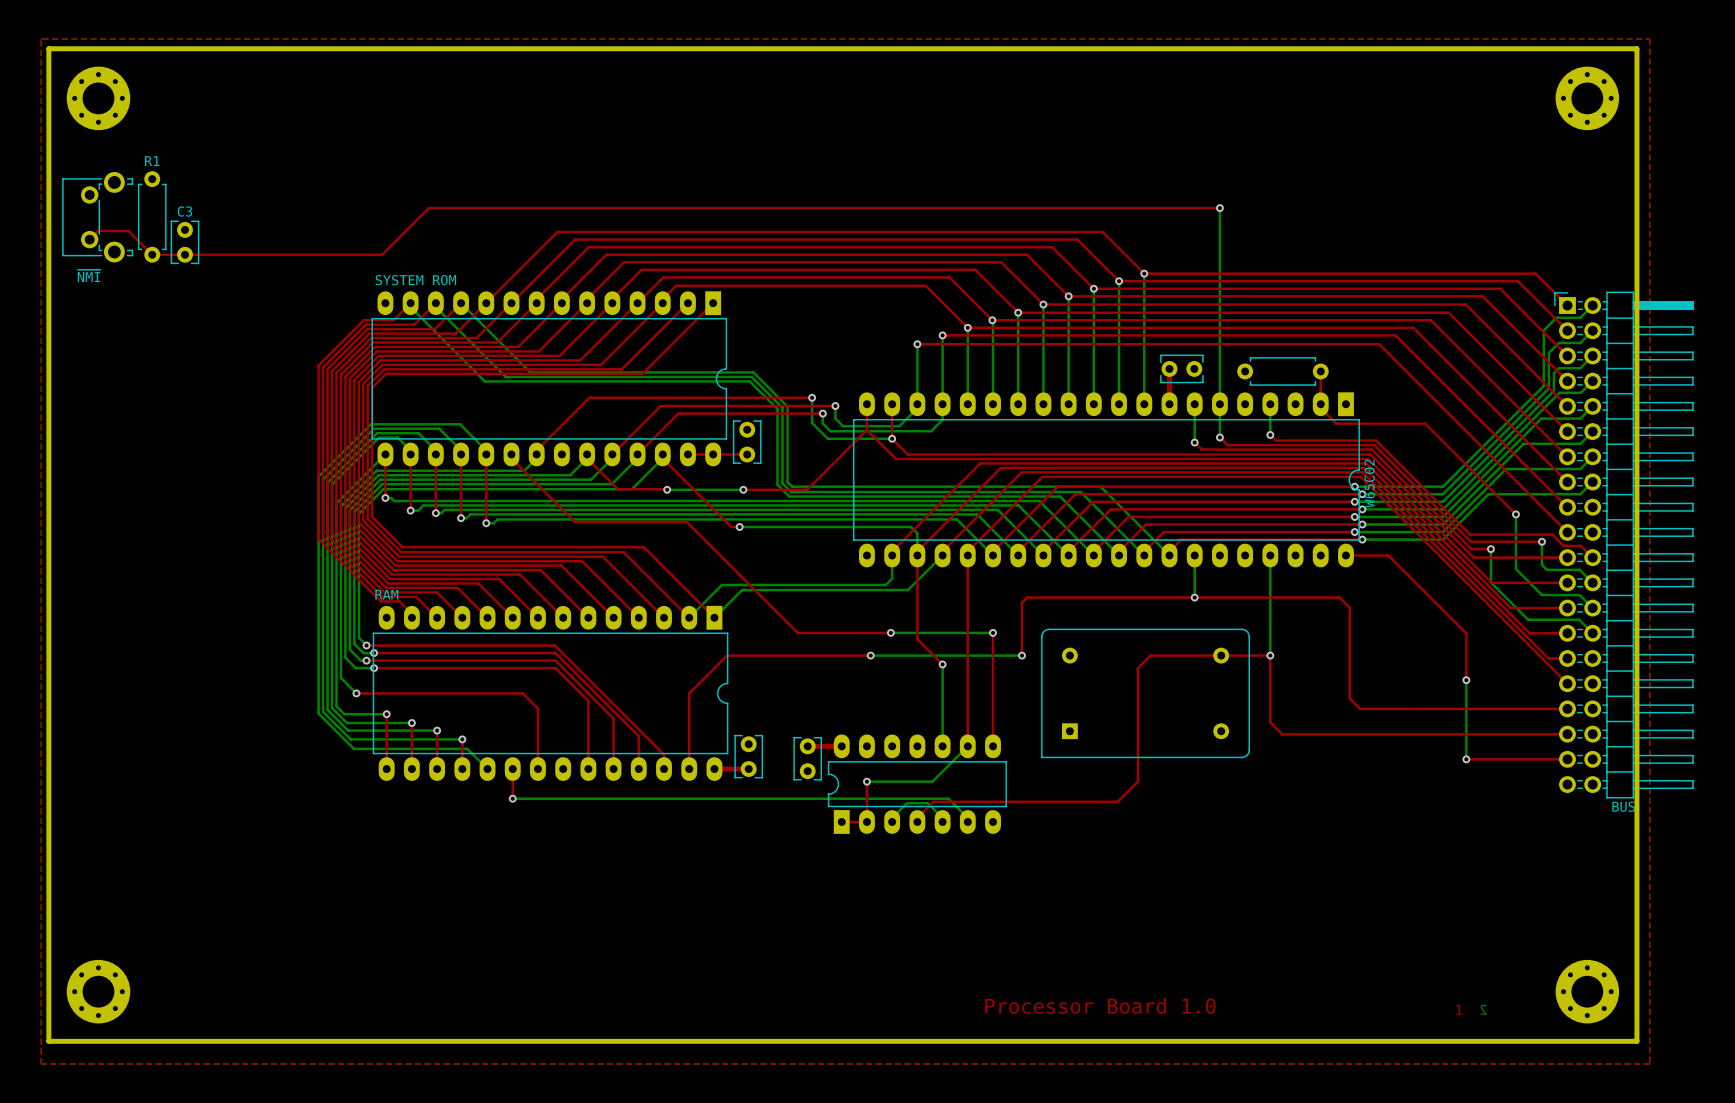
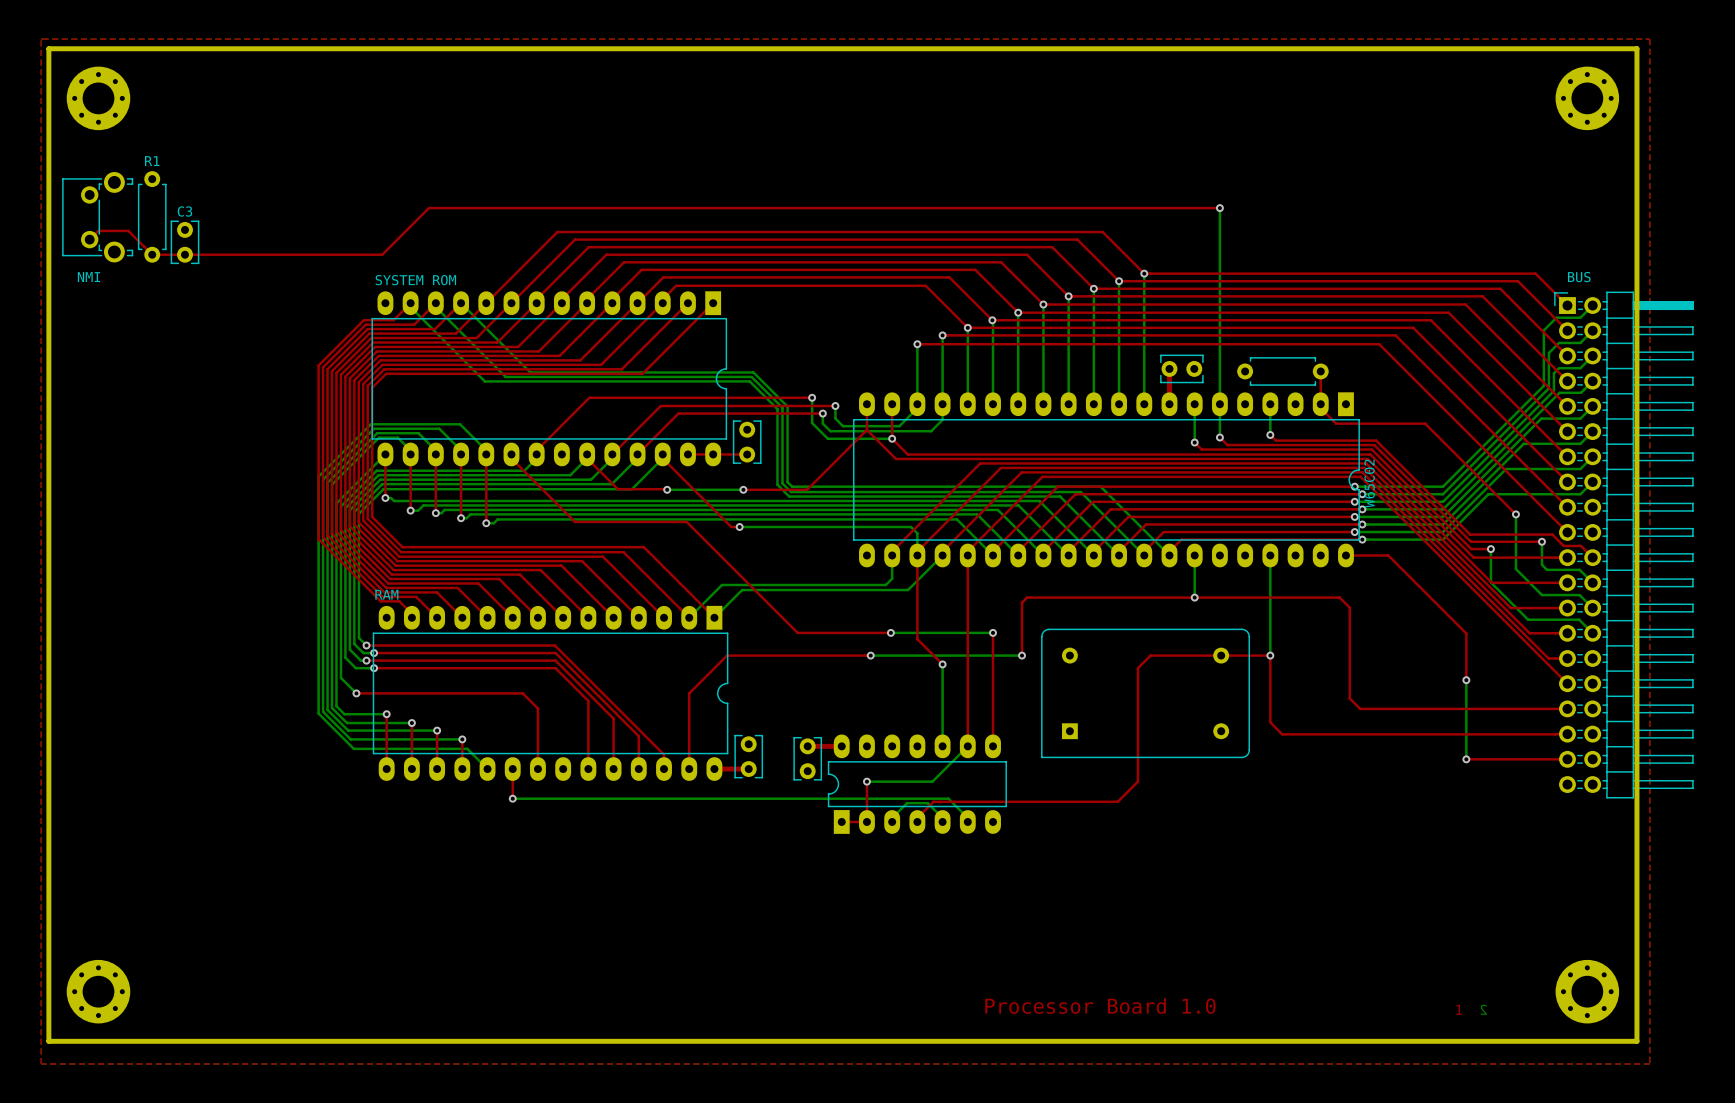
part value: ~{NMI} (89, 275) -> NMI (88, 277)
part value position: BUS (1623, 806) -> BUS (1579, 277)

